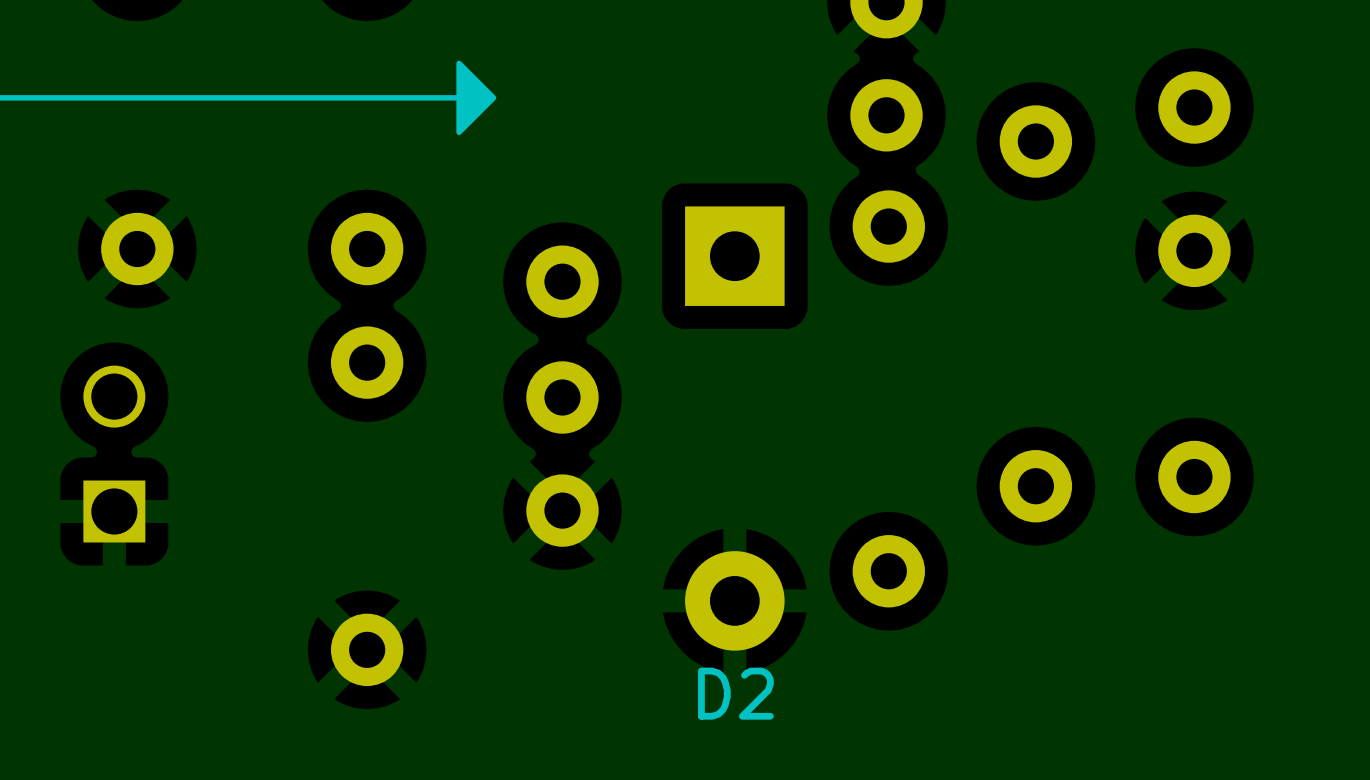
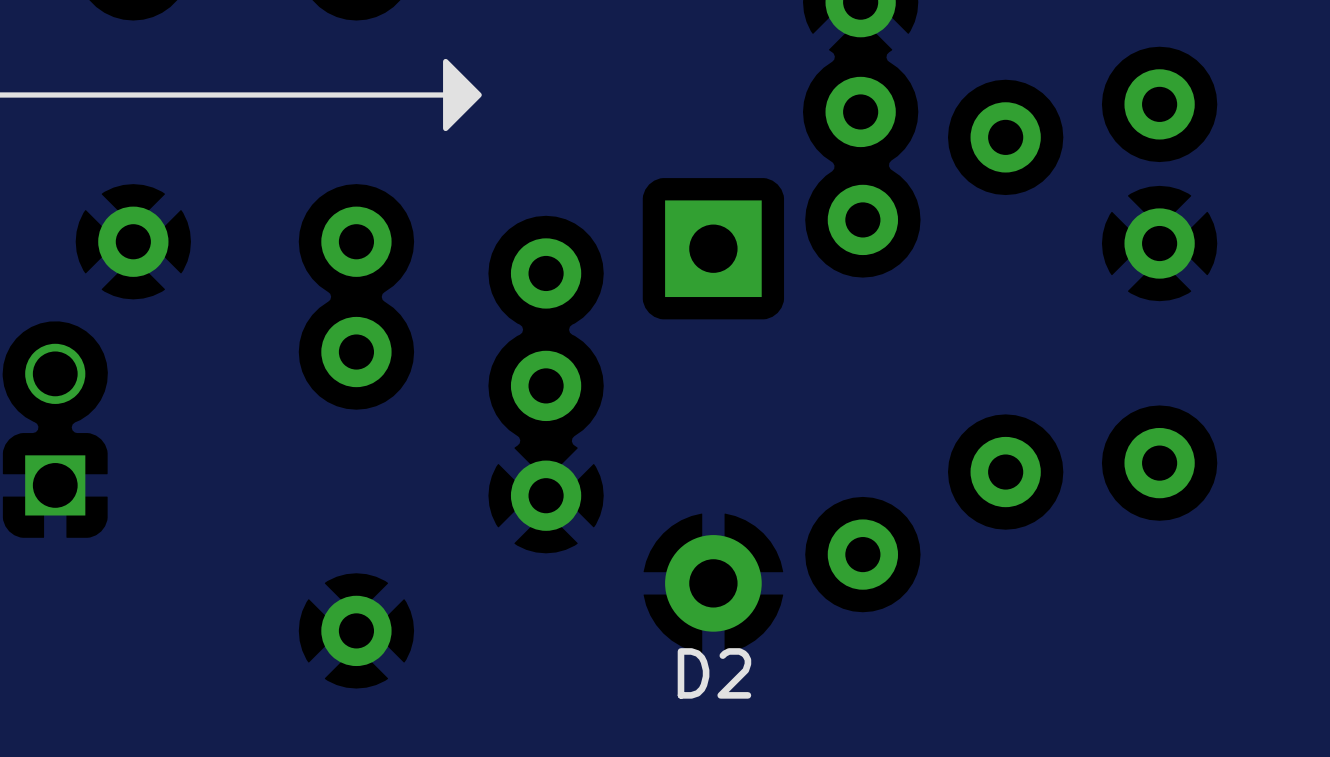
part position: (114, 454) -> (55, 429)

